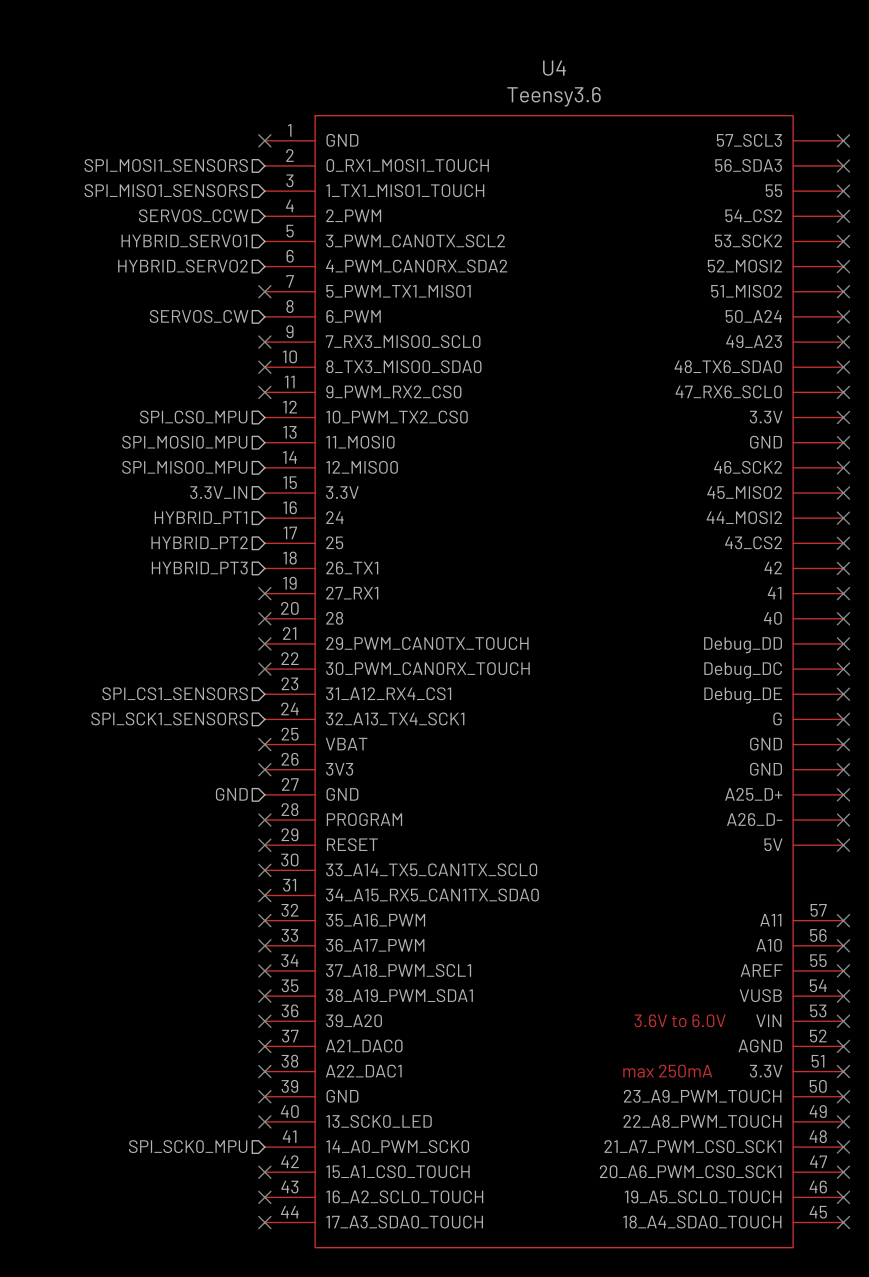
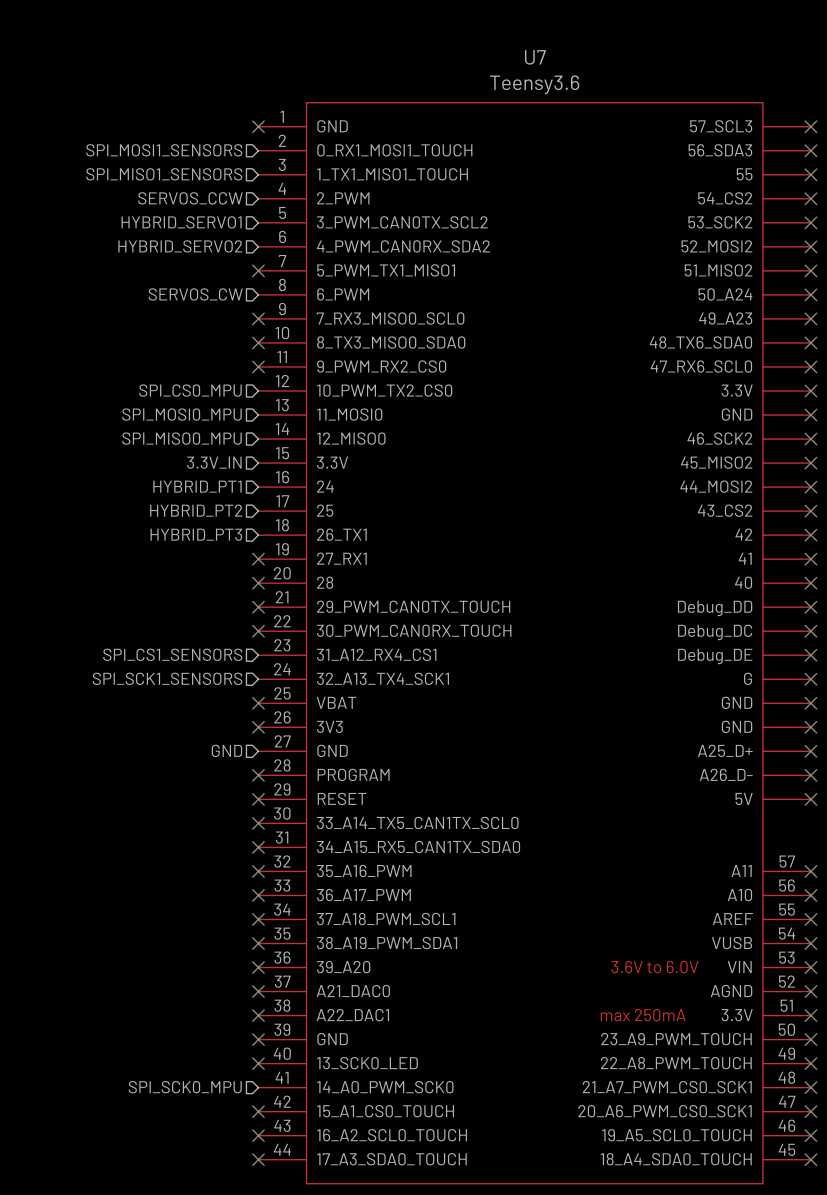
U4 name: U4 (554, 68) -> U7 (535, 57)

